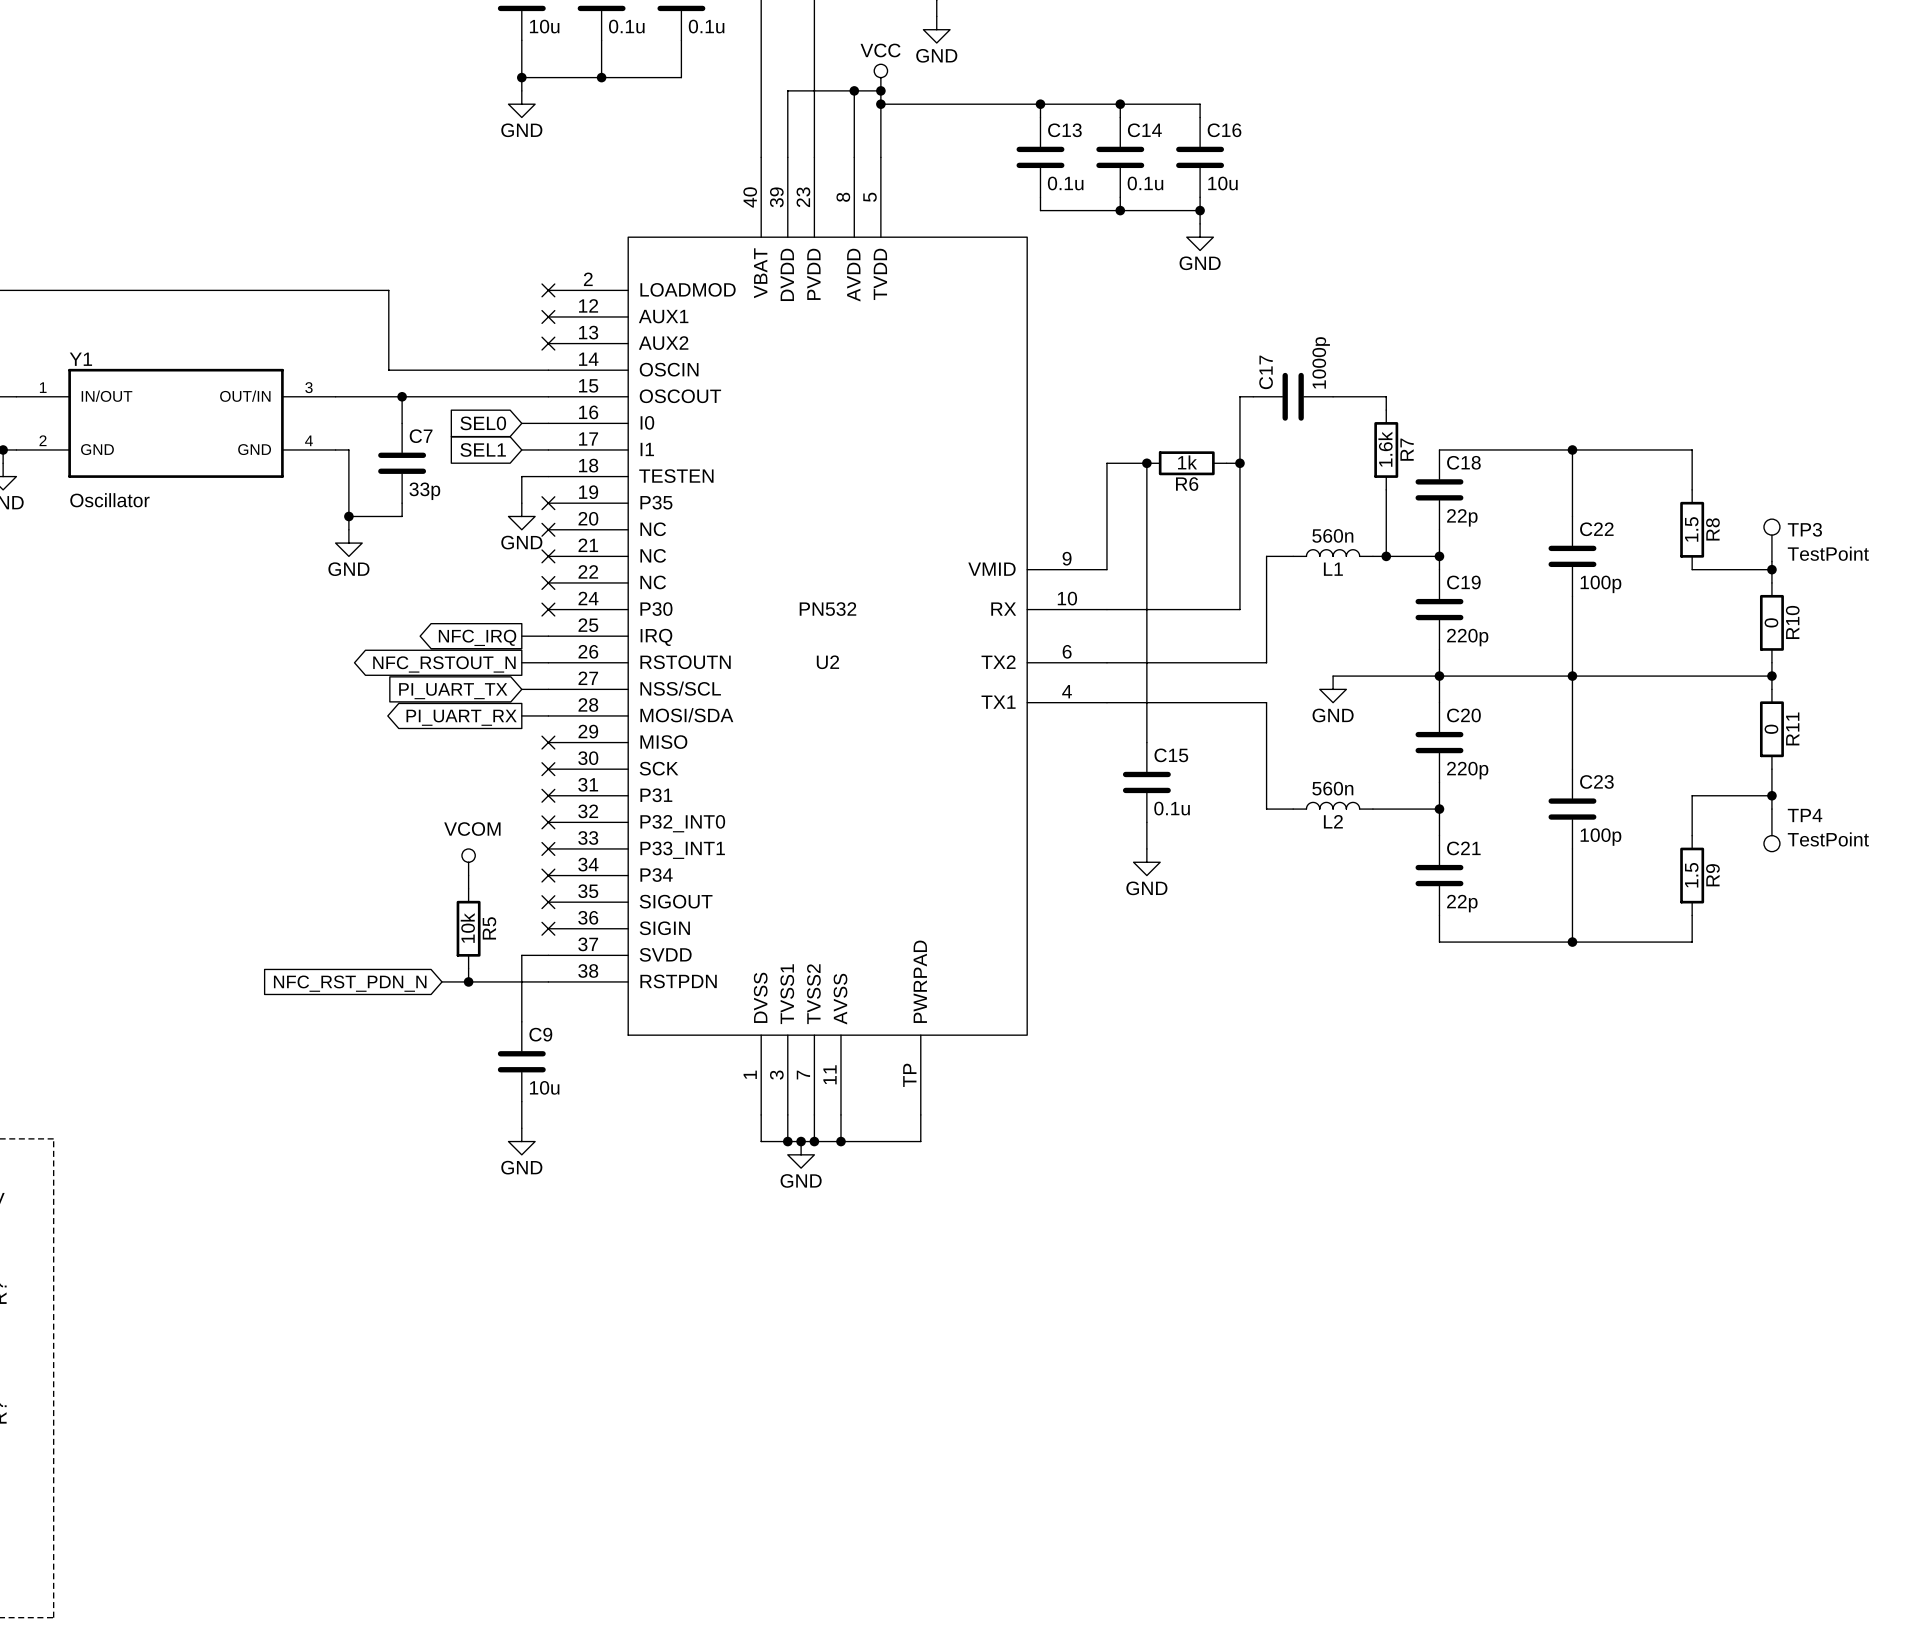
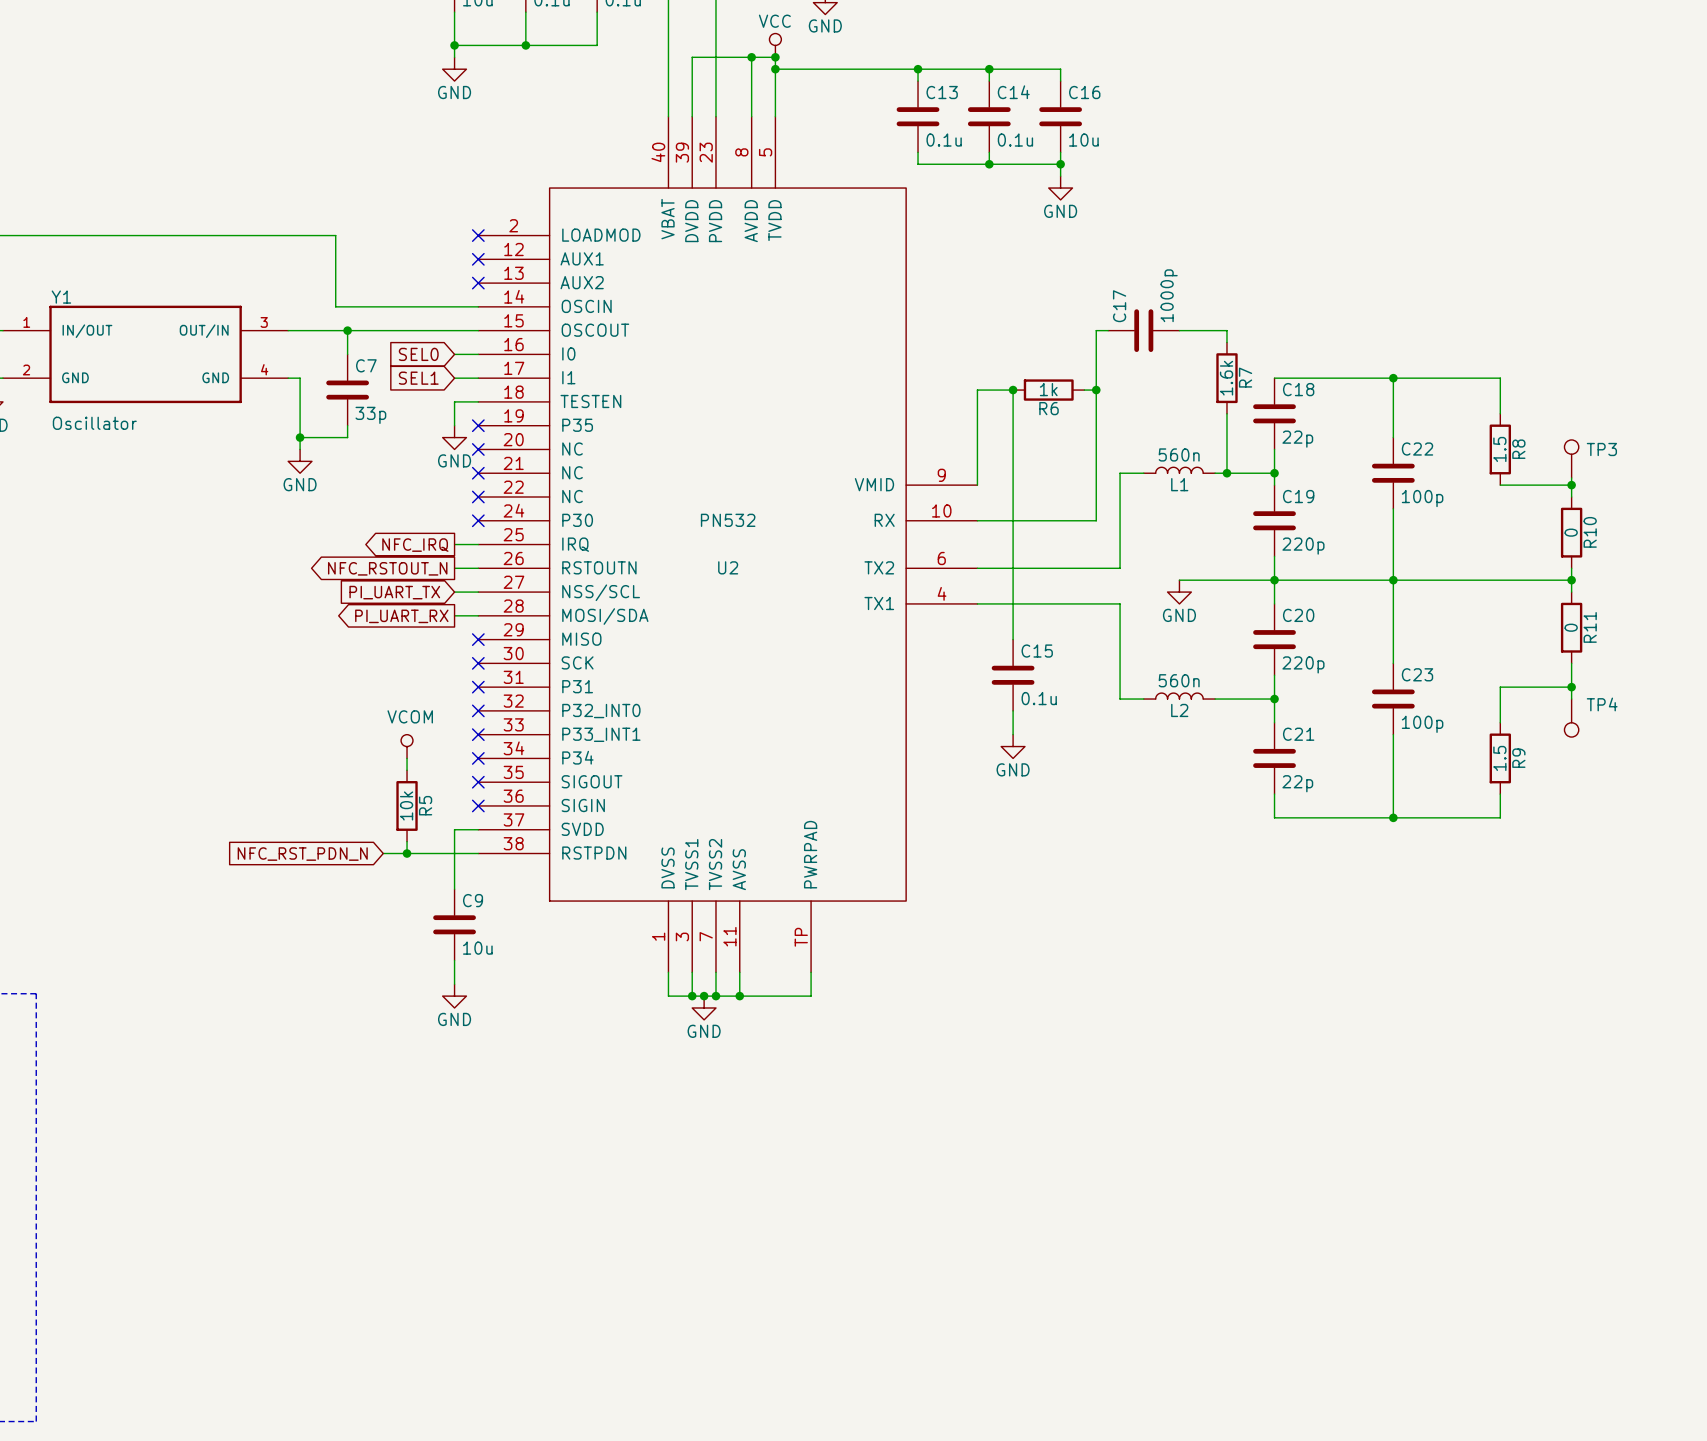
TP3 value: TestPoint (1828, 553) -> none
TP4 value: TestPoint (1828, 839) -> none

